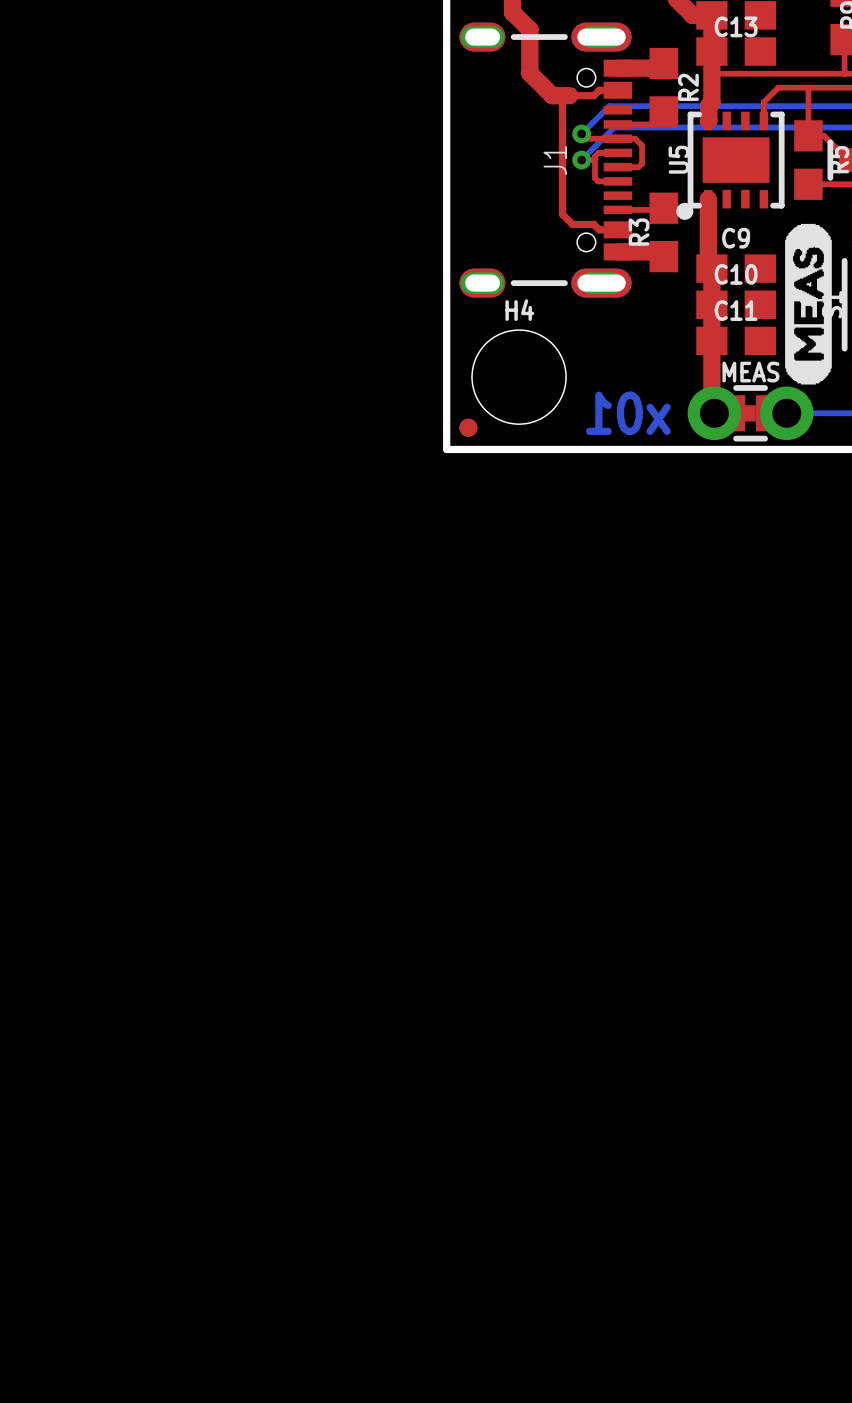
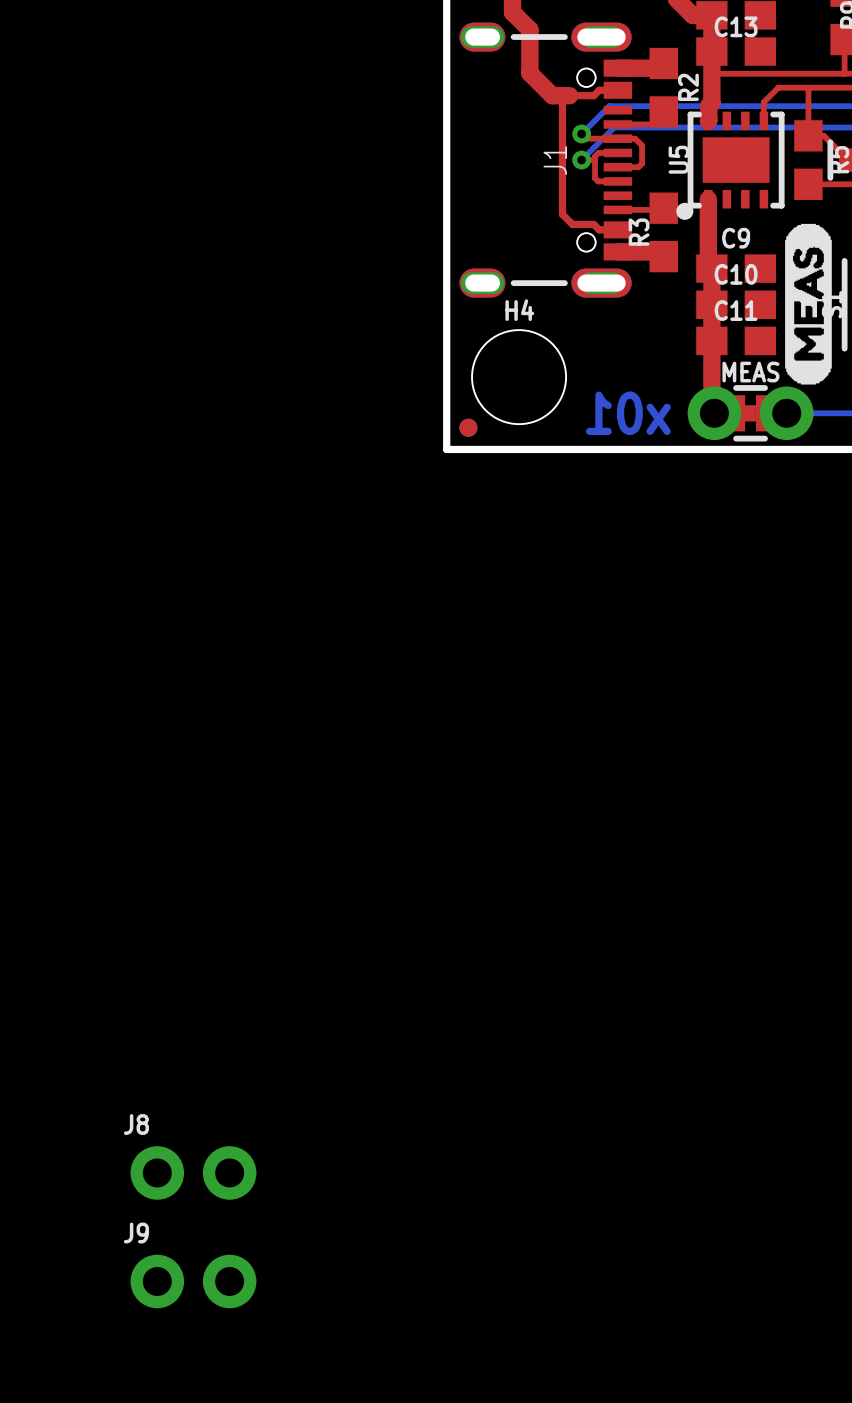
J8: none -> (193, 1172)
J9: none -> (193, 1281)

